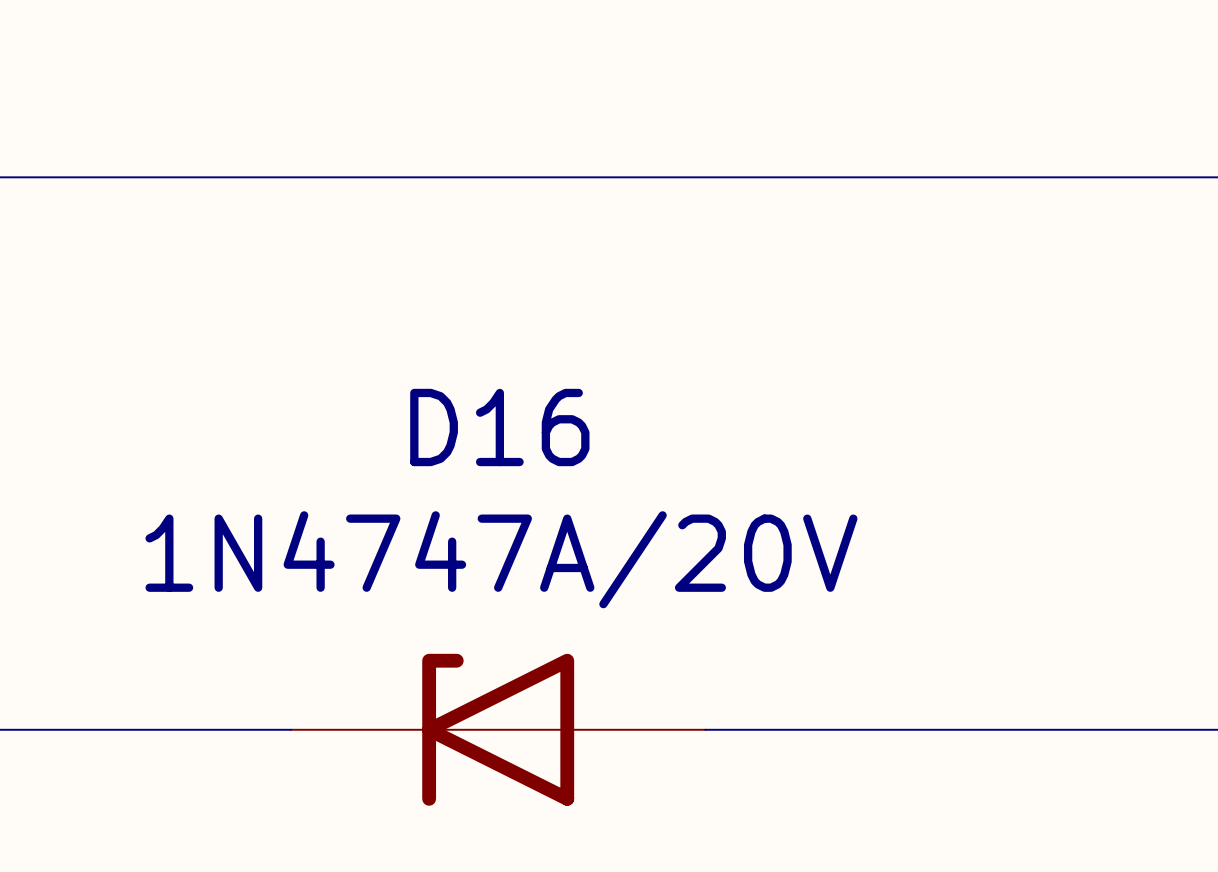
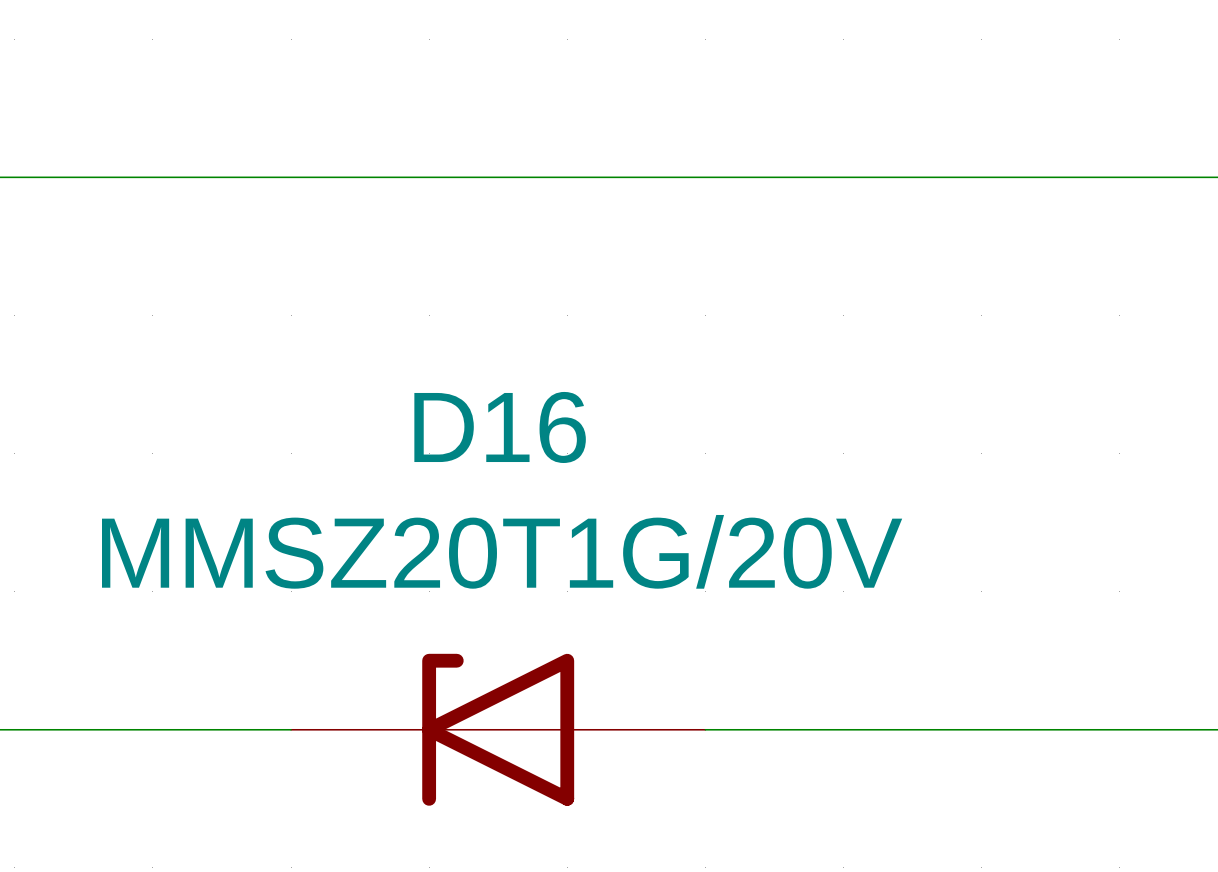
D16 value: 1N4747A/20V (501, 559) -> MMSZ20T1G/20V (502, 551)

